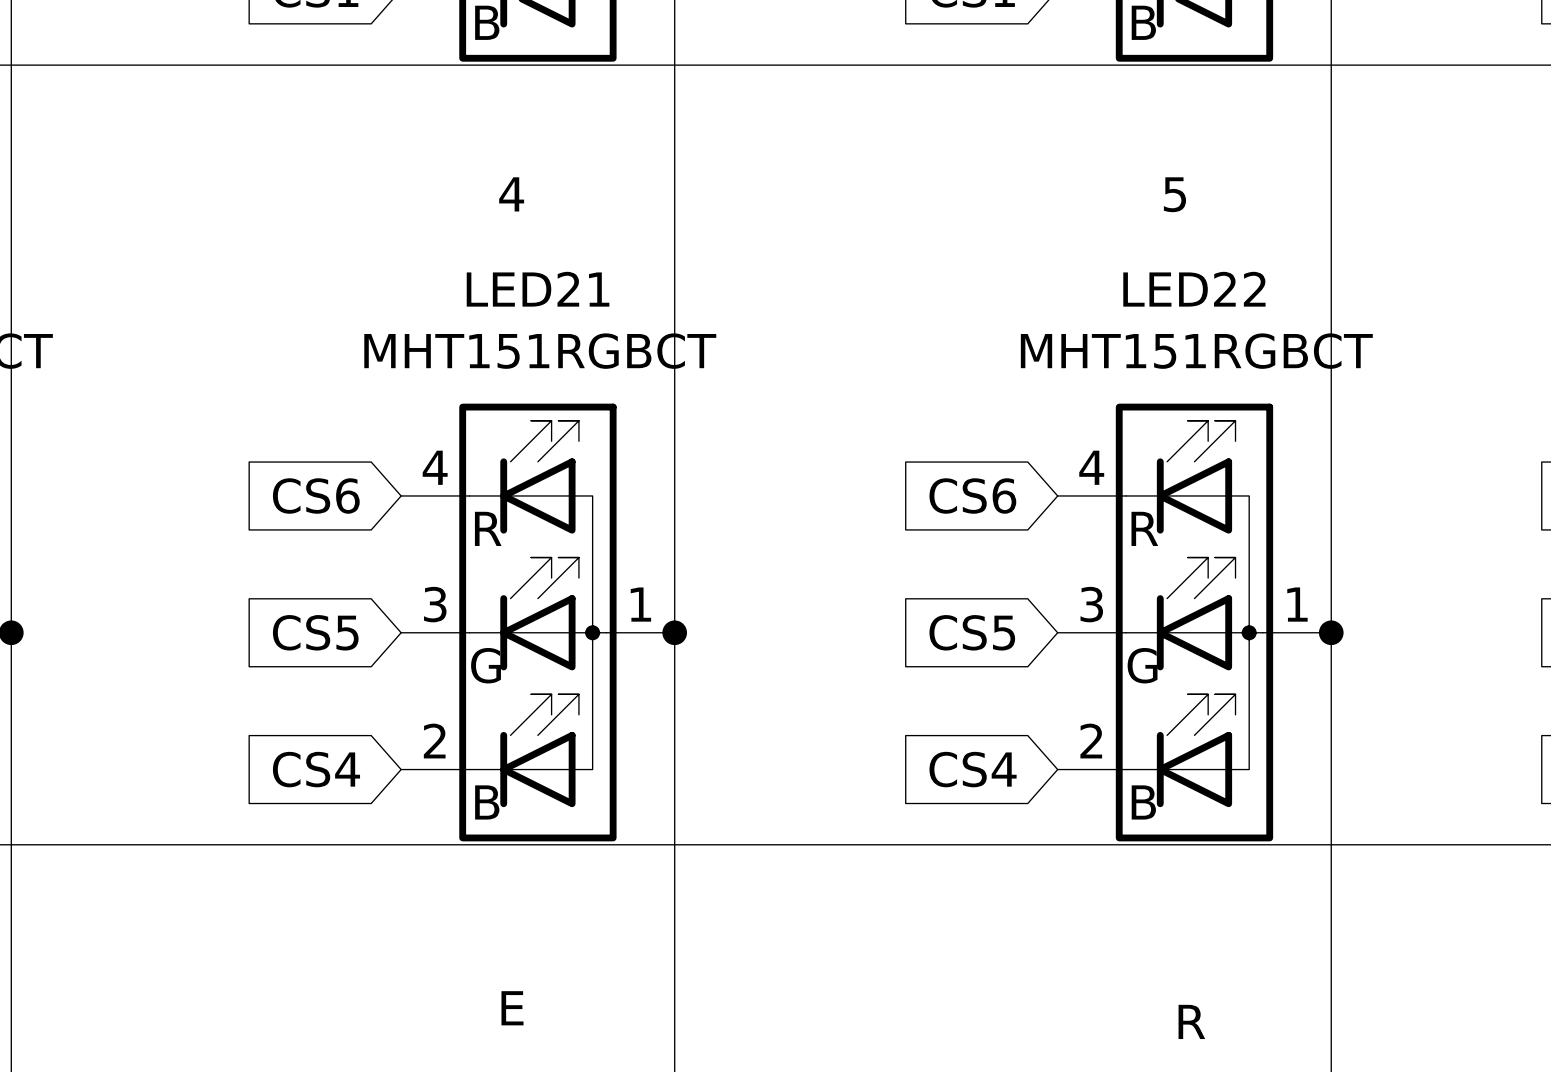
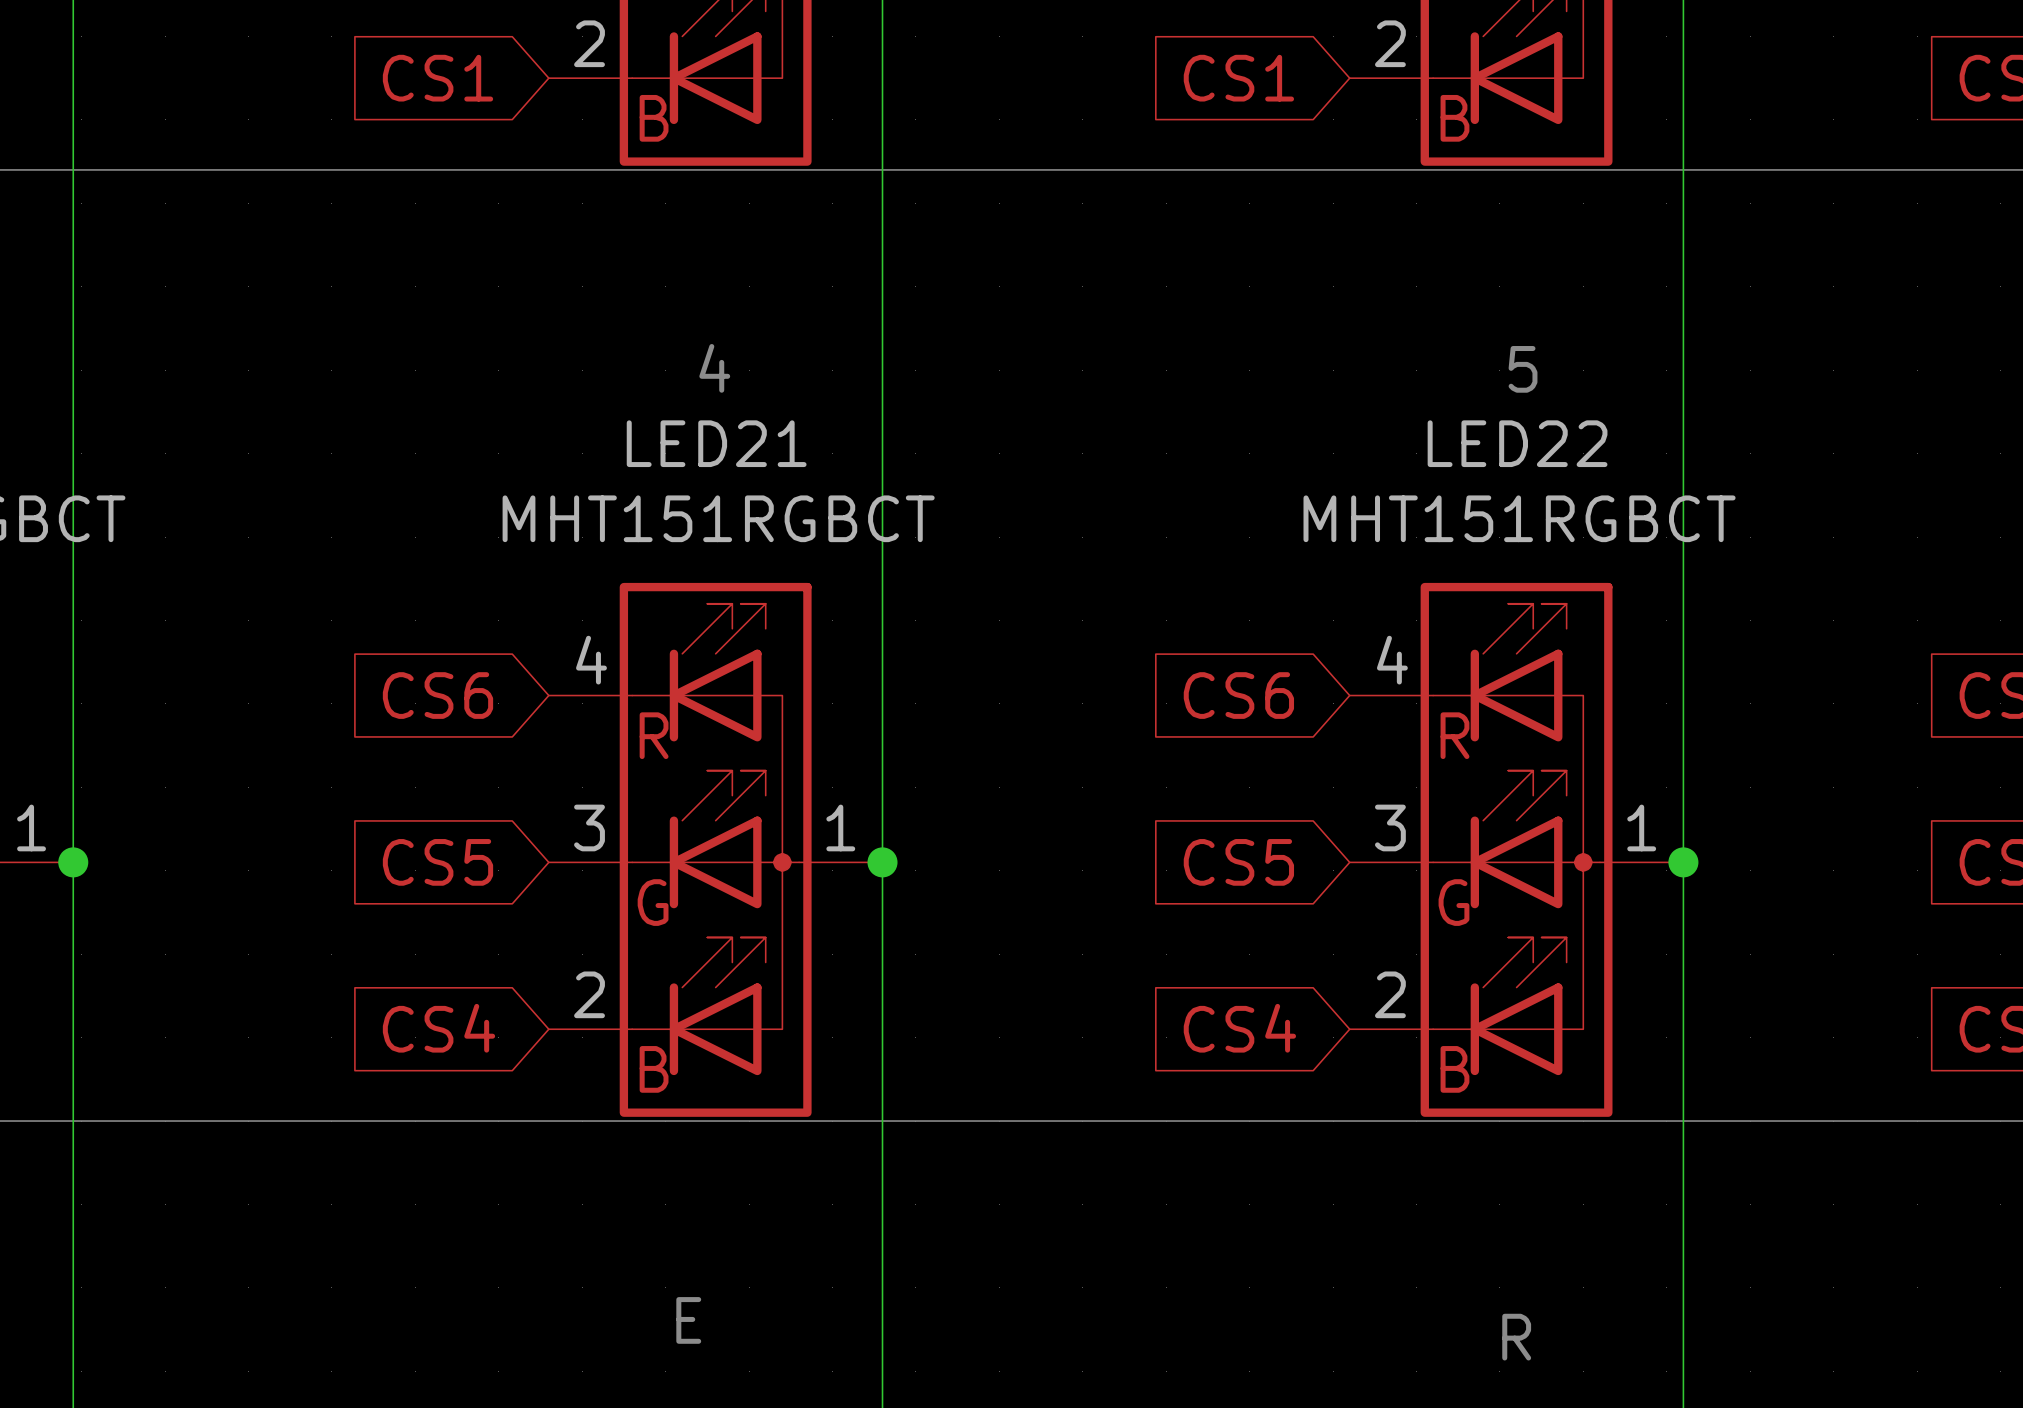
text position: 4 (511, 194) -> 4 (714, 368)
text position: 5 (1174, 194) -> 5 (1523, 369)

